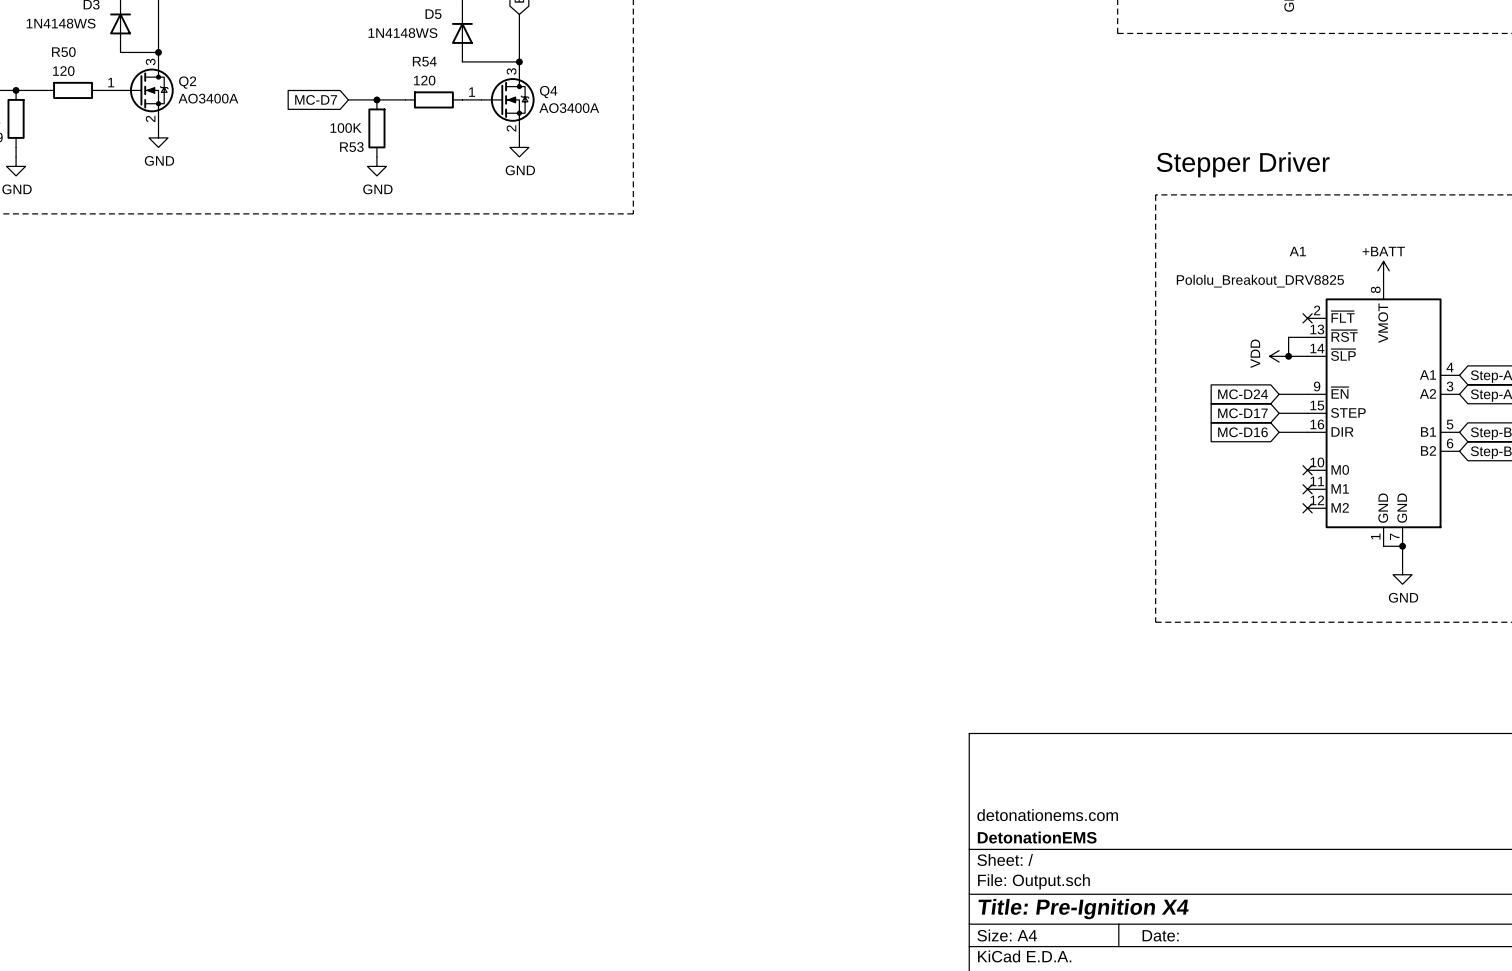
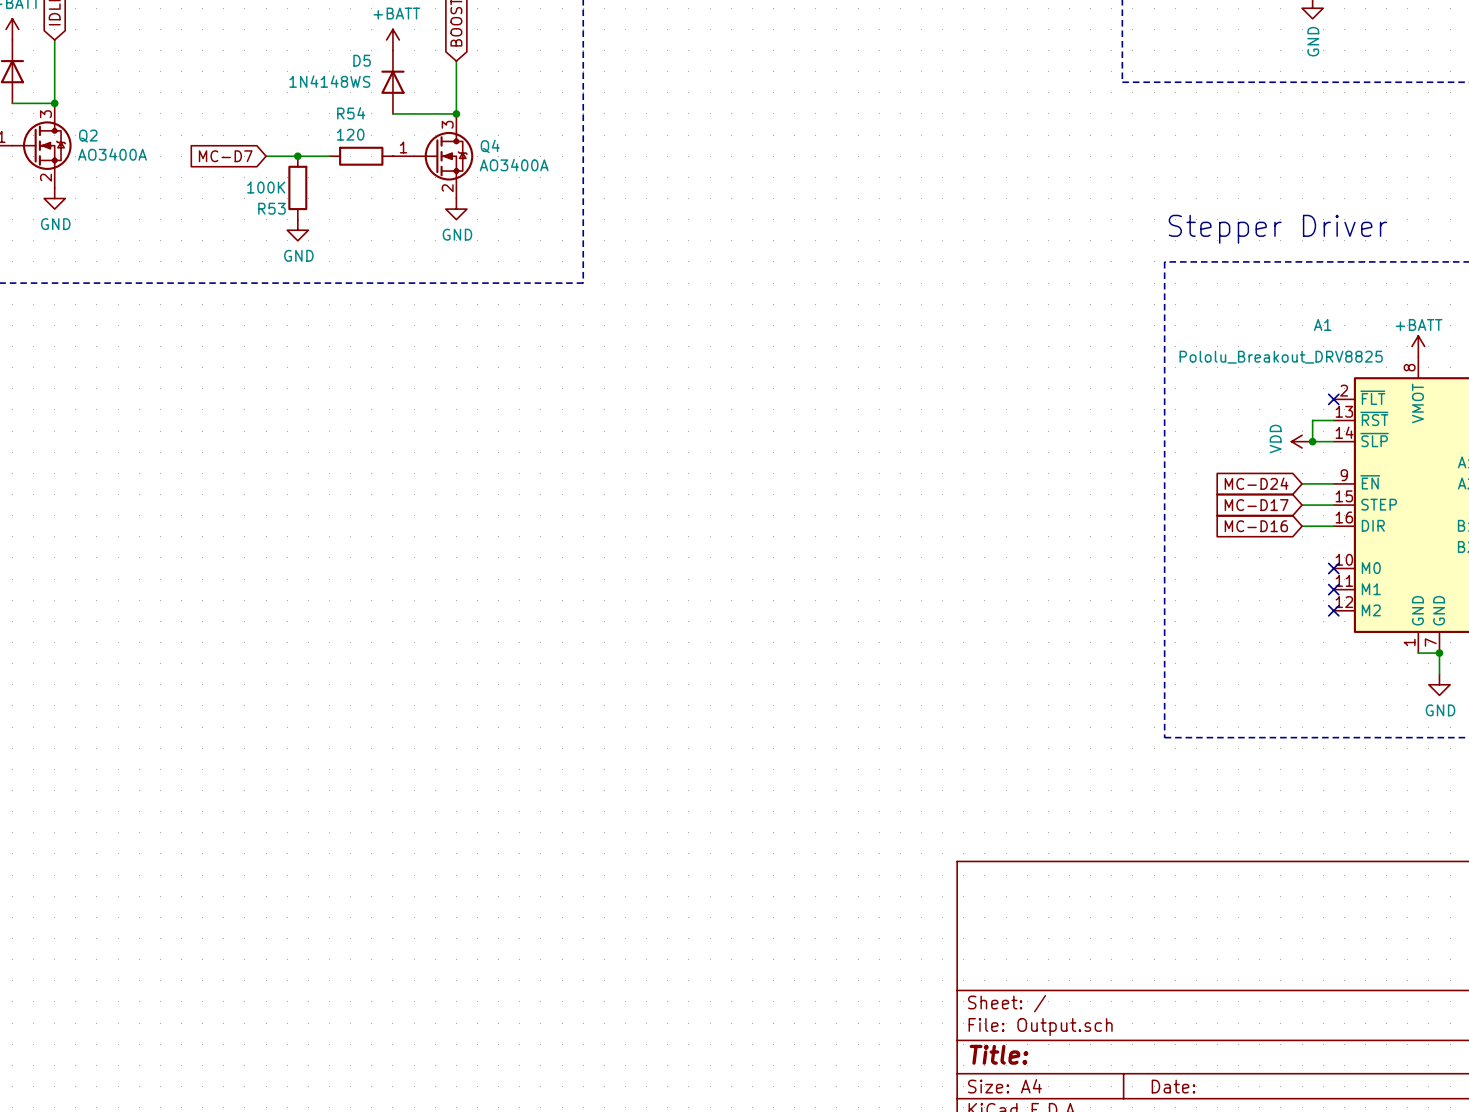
title block: detonationems.com (1047, 815) -> none
title block: DetonationEMS (1037, 837) -> none
title block: Title: Pre-Ignition X4 (1083, 909) -> Title: (999, 1054)

